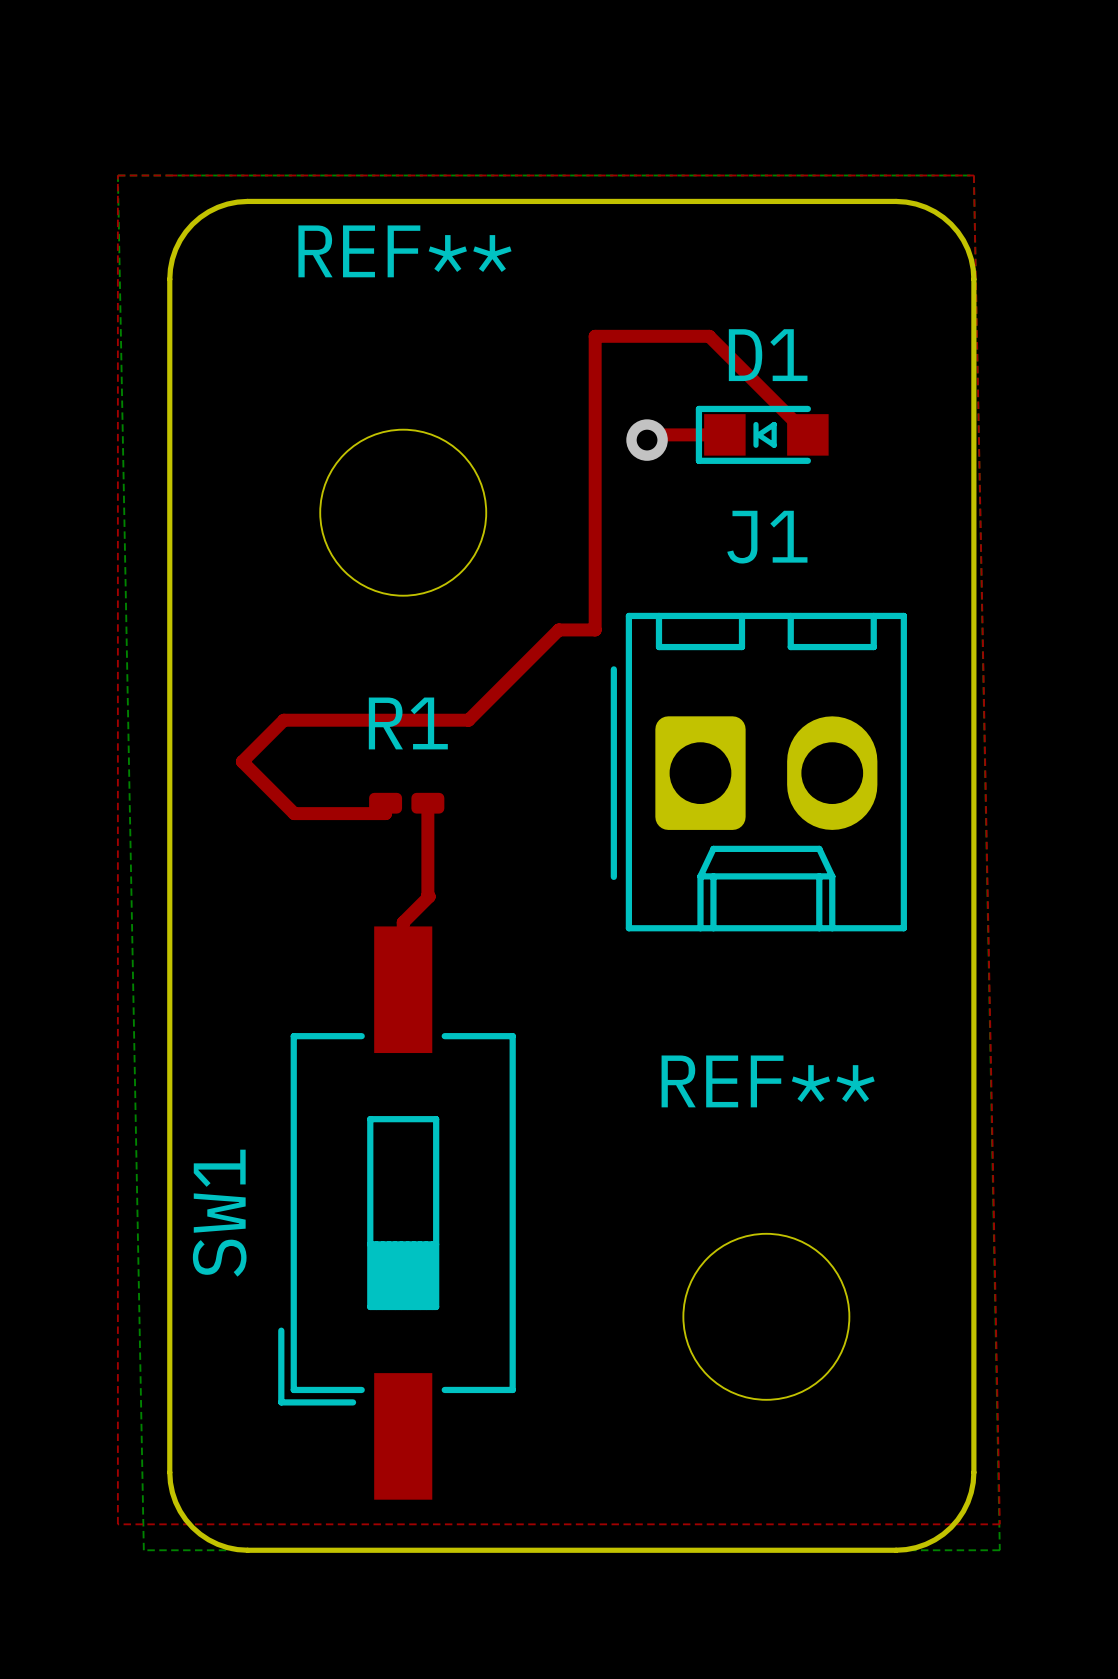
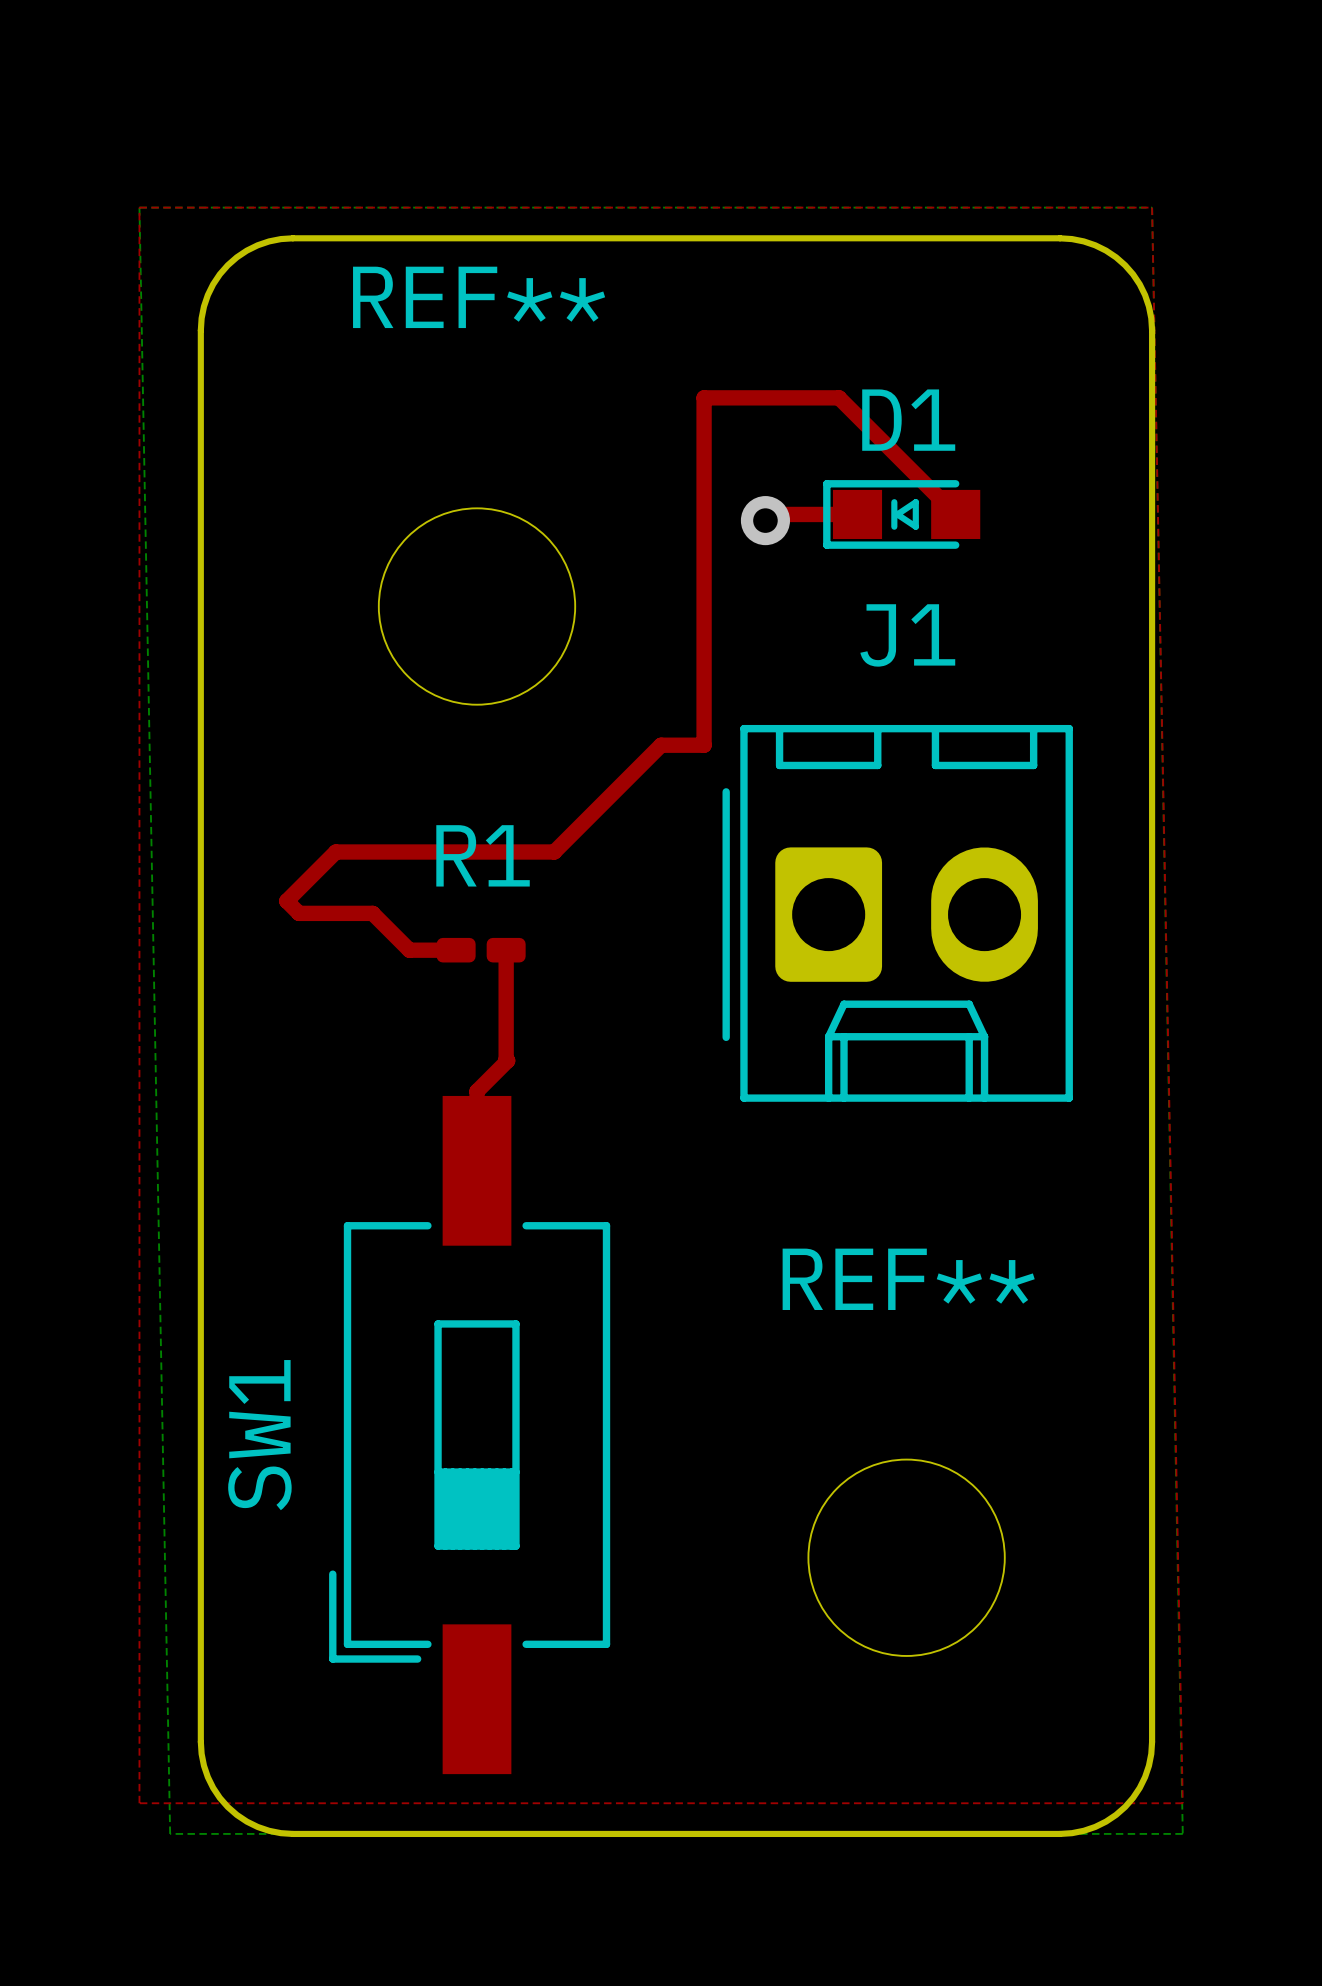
top track: (252, 772) (294, 813) (385, 813) (385, 803) -> (299, 913) (372, 913) (409, 950) (456, 950)

